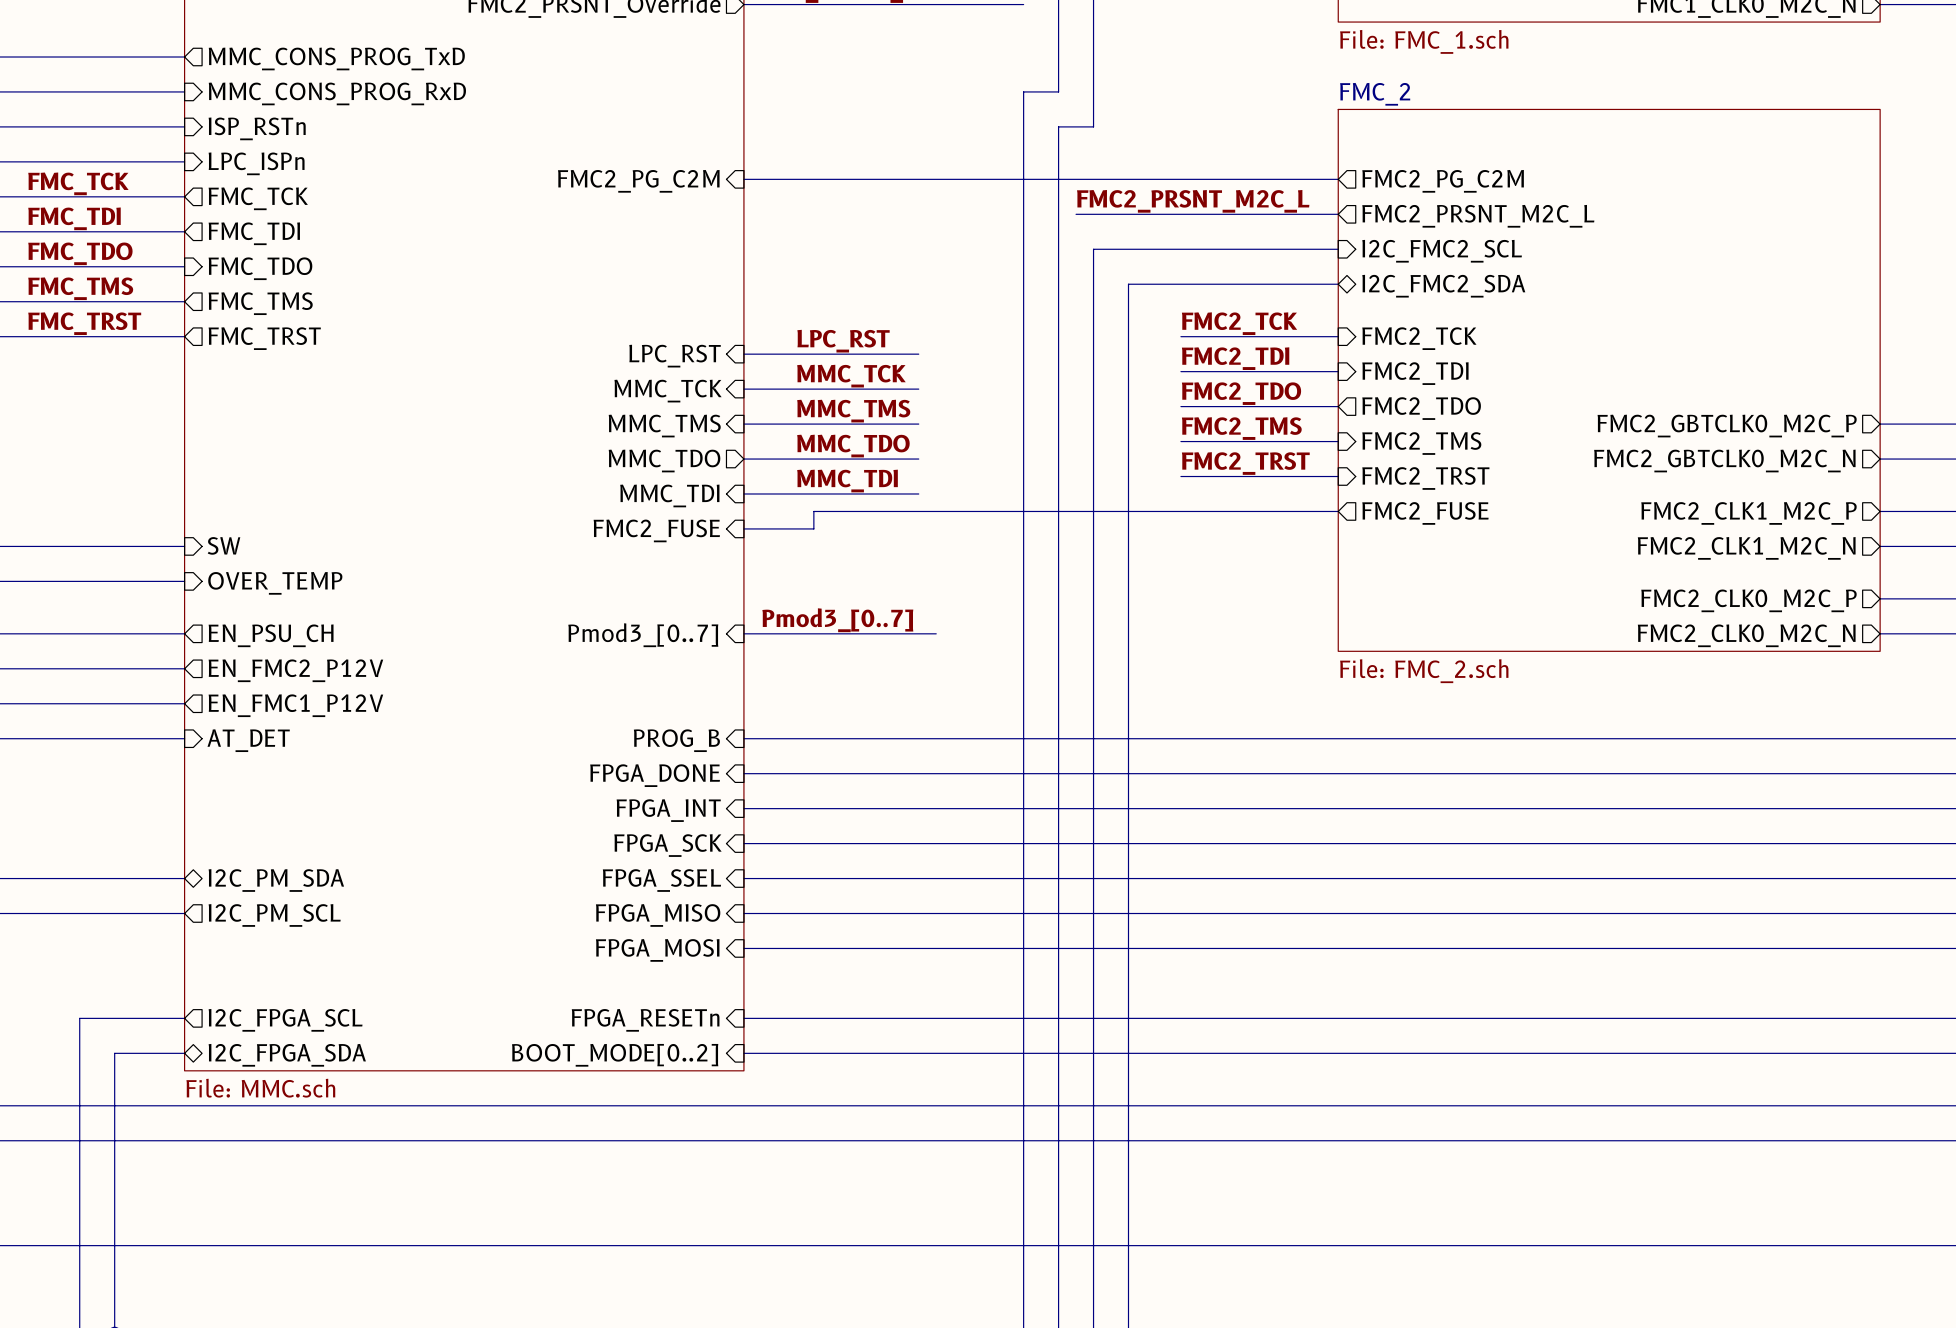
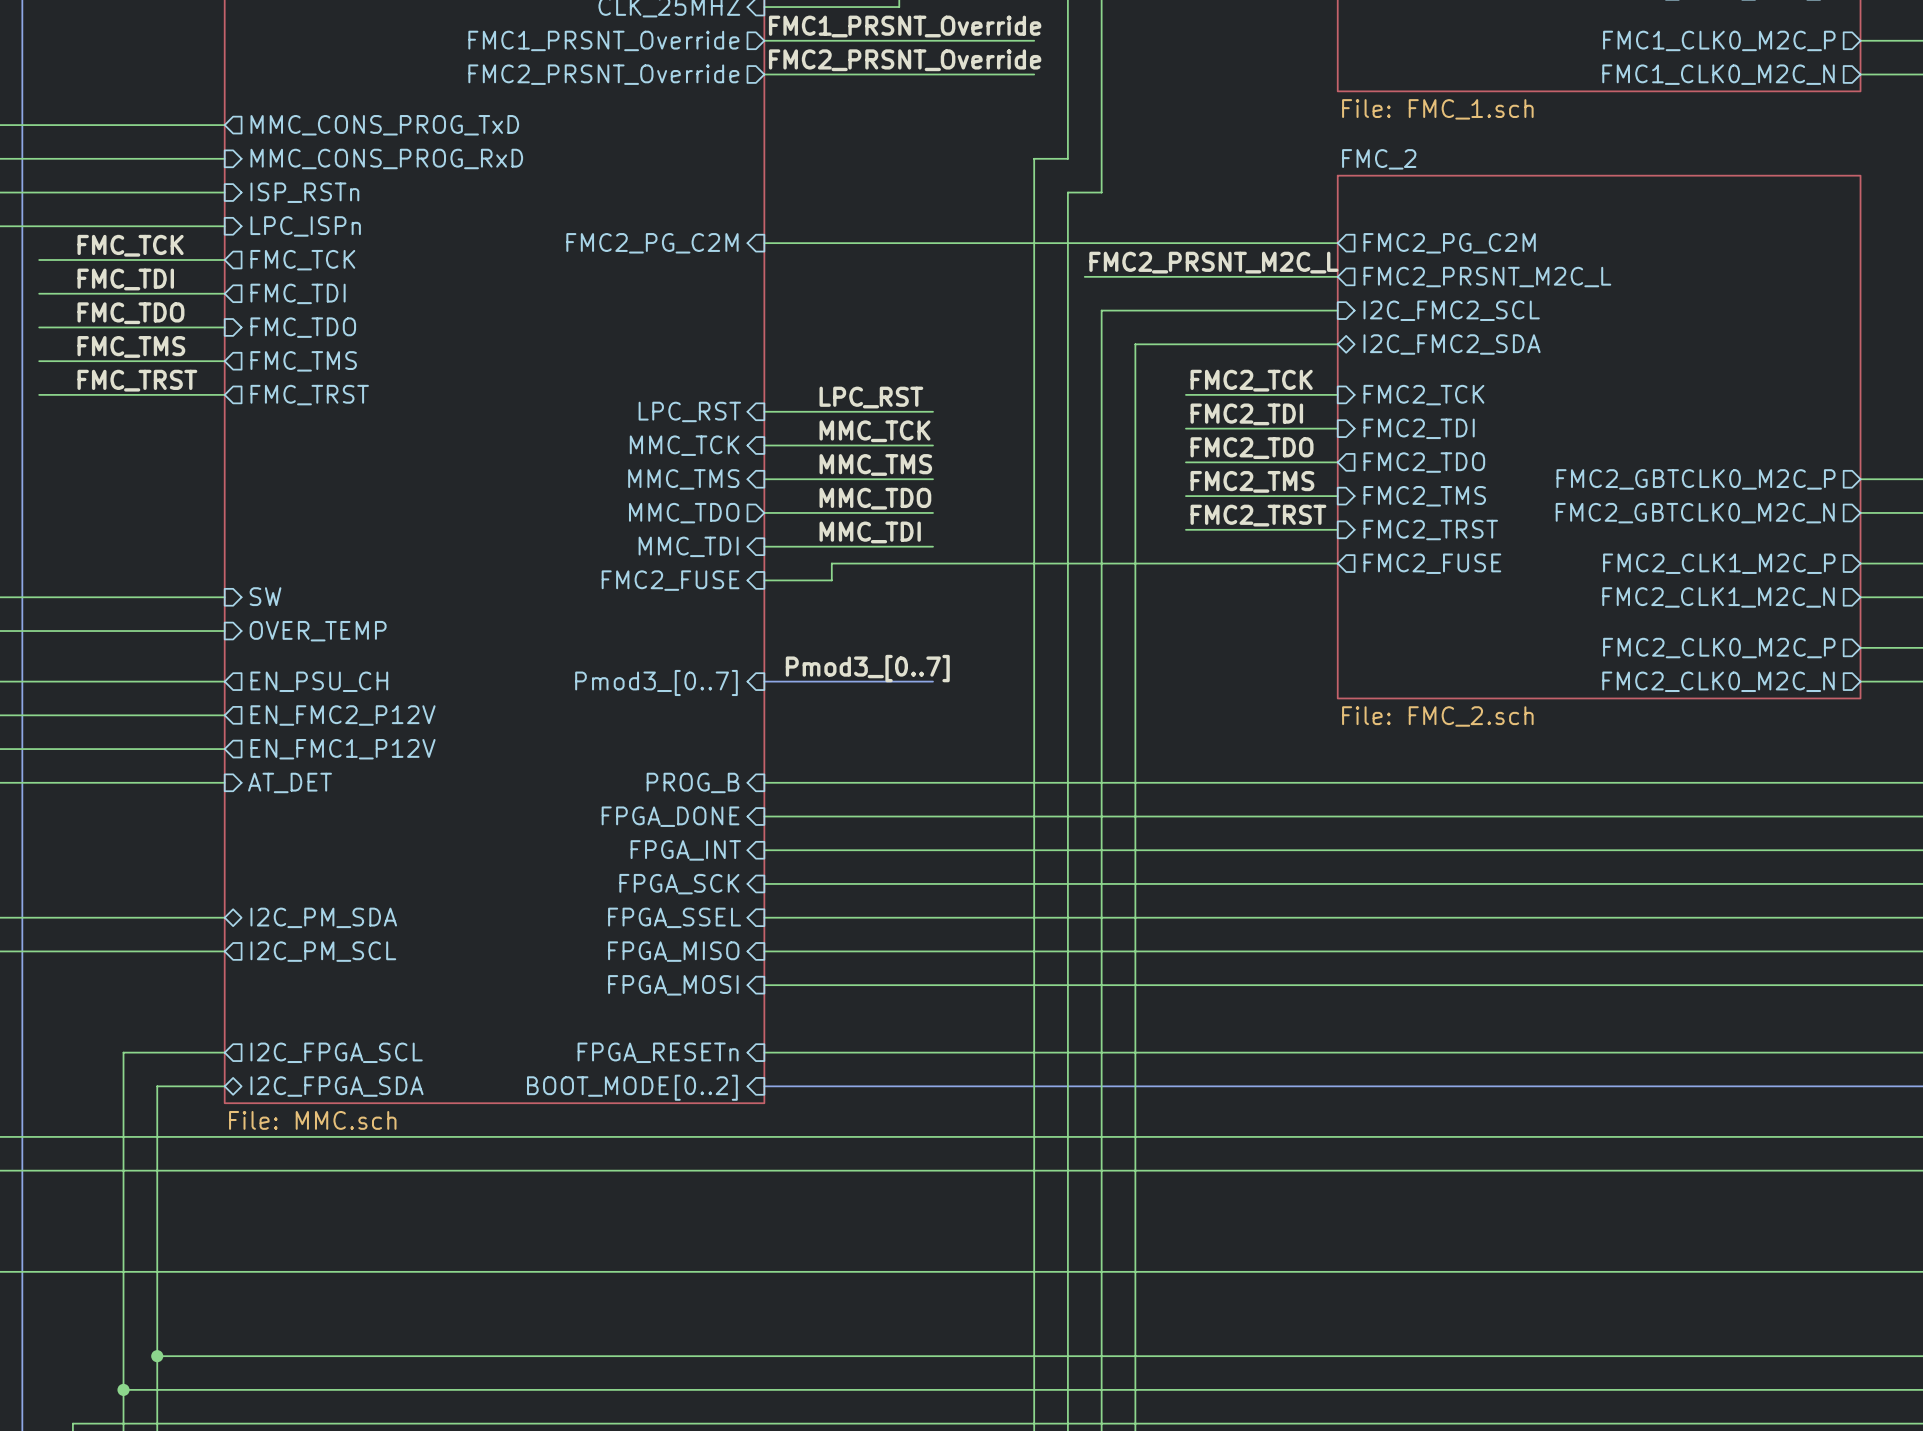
bus: (918, 633) (936, 633) -> none

